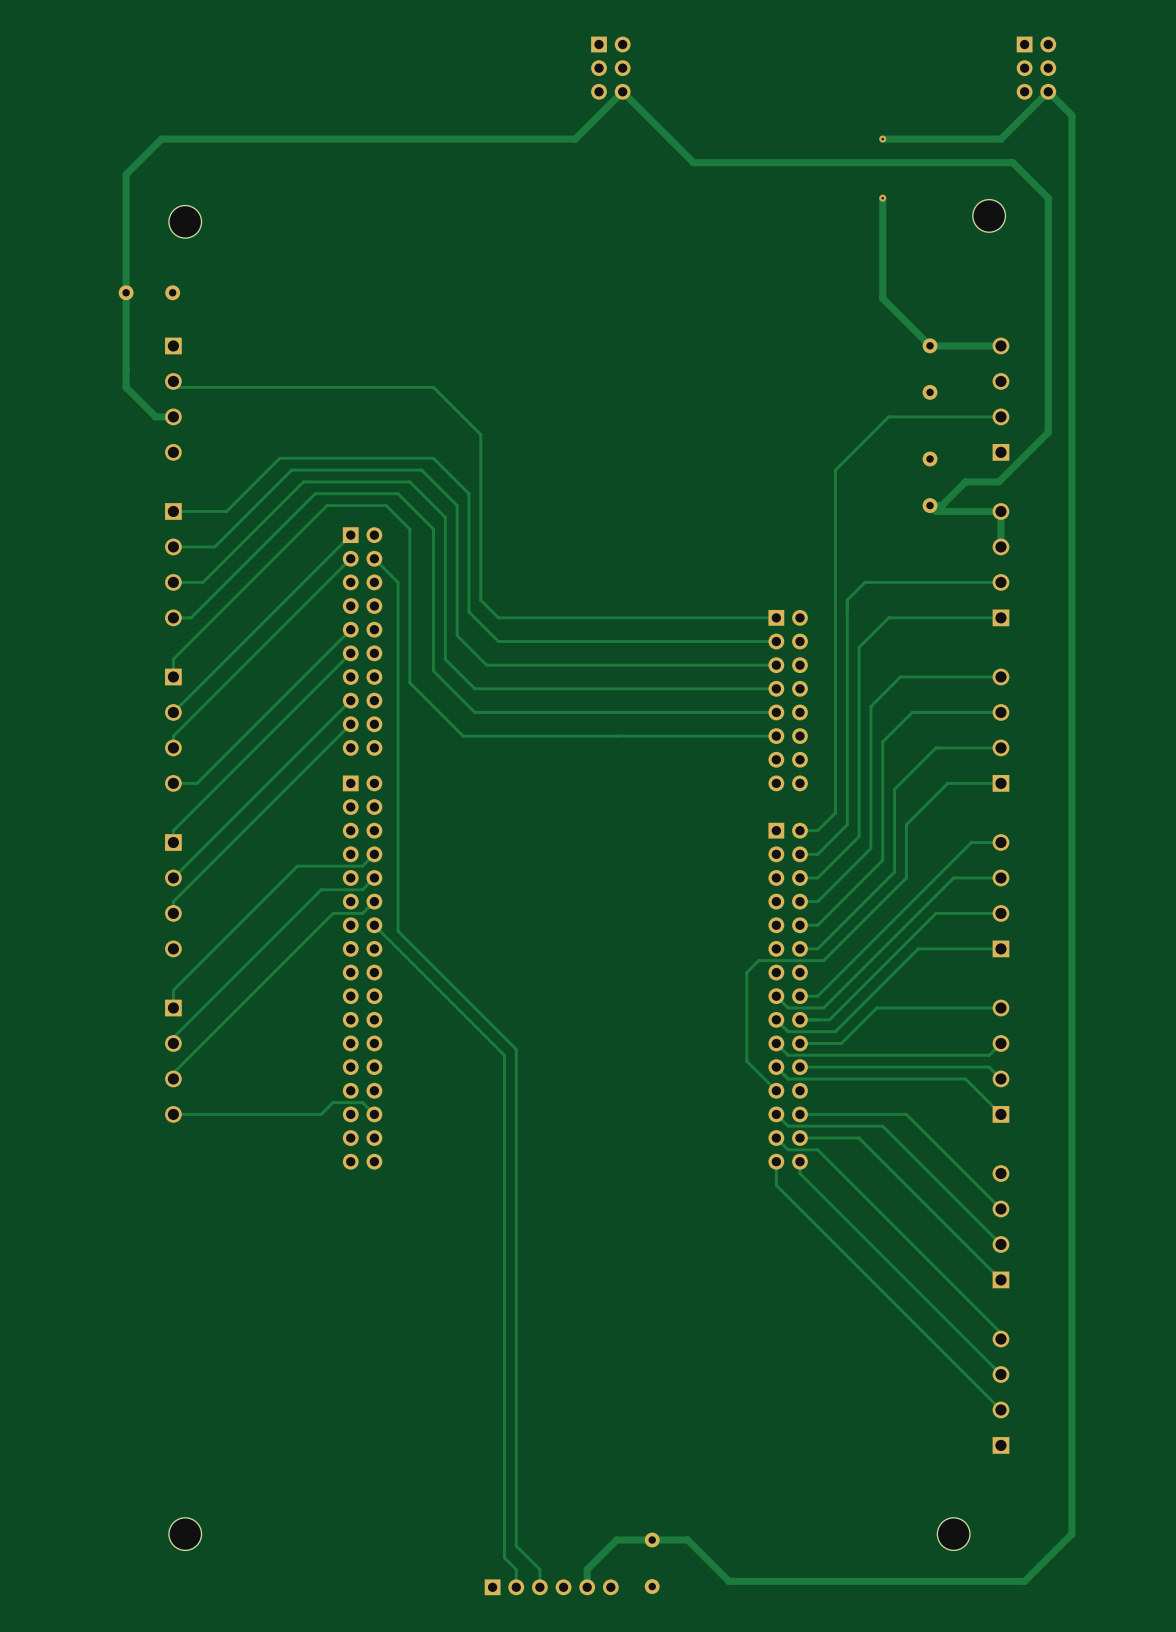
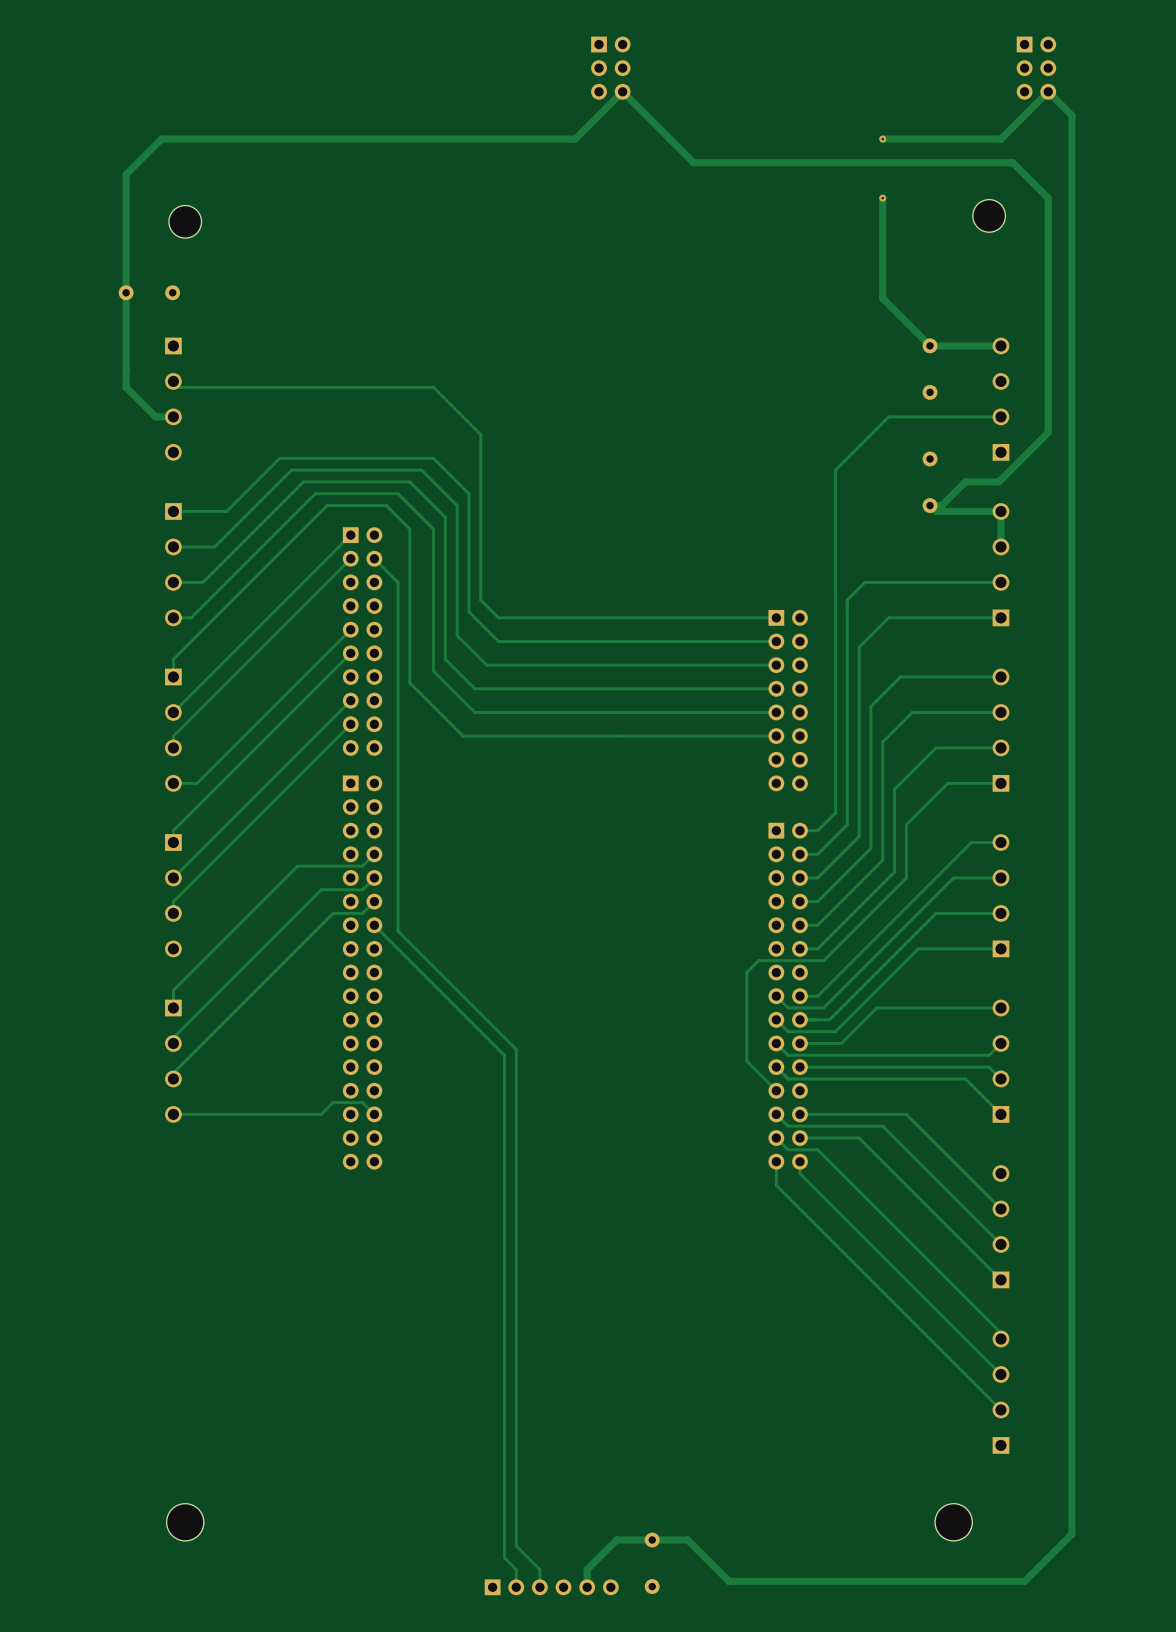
part: none -> (185, 1522)
part: none -> (953, 1522)
part: (185, 1534) -> none
part: (953, 1534) -> none

